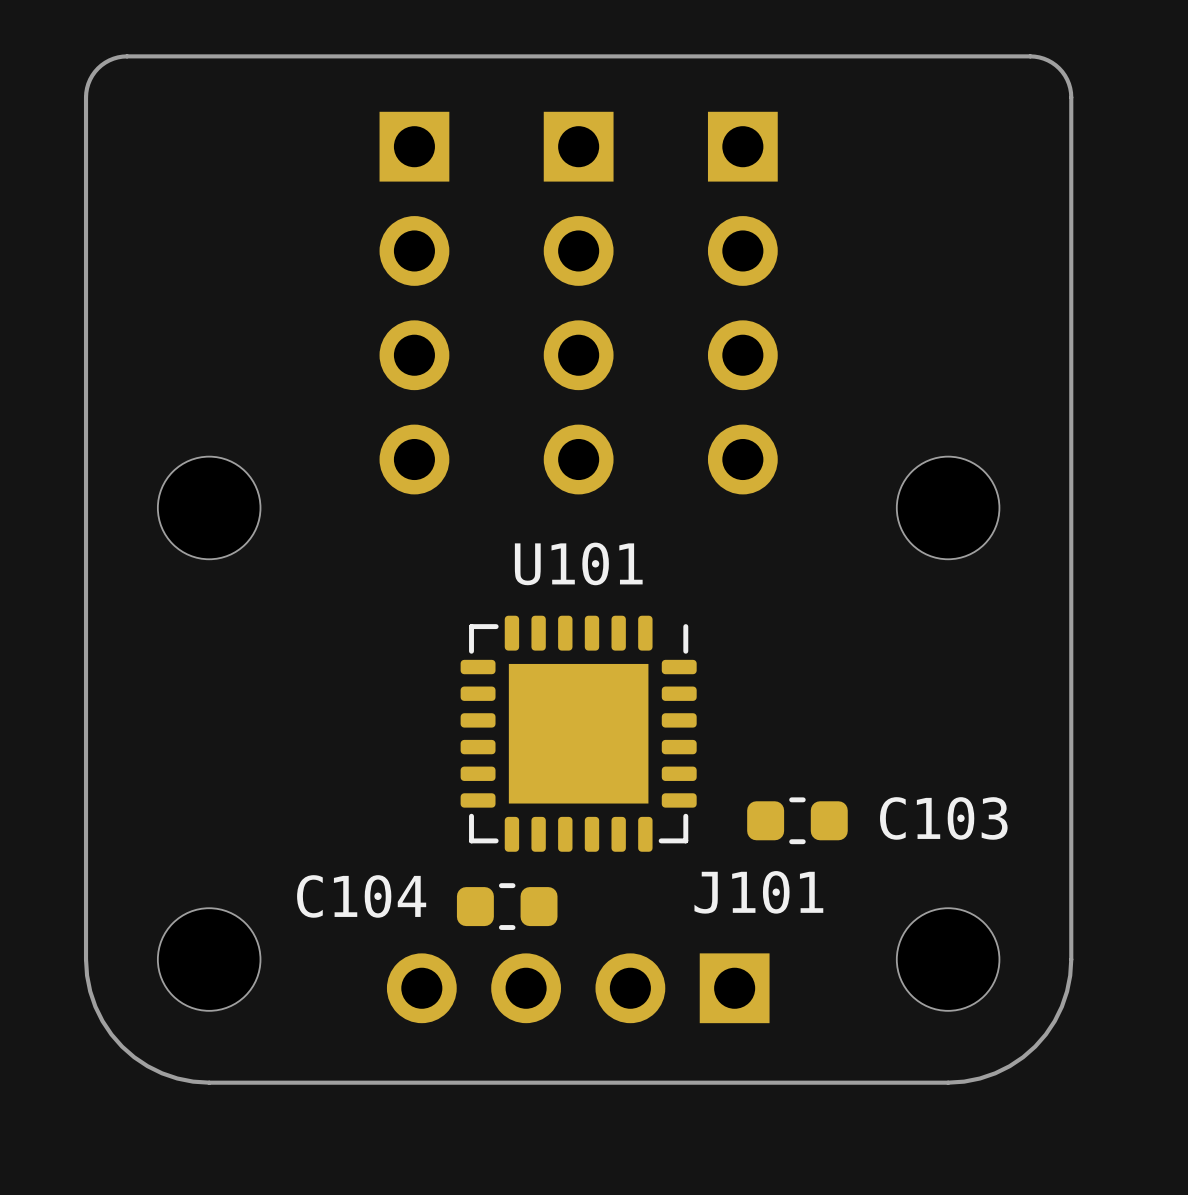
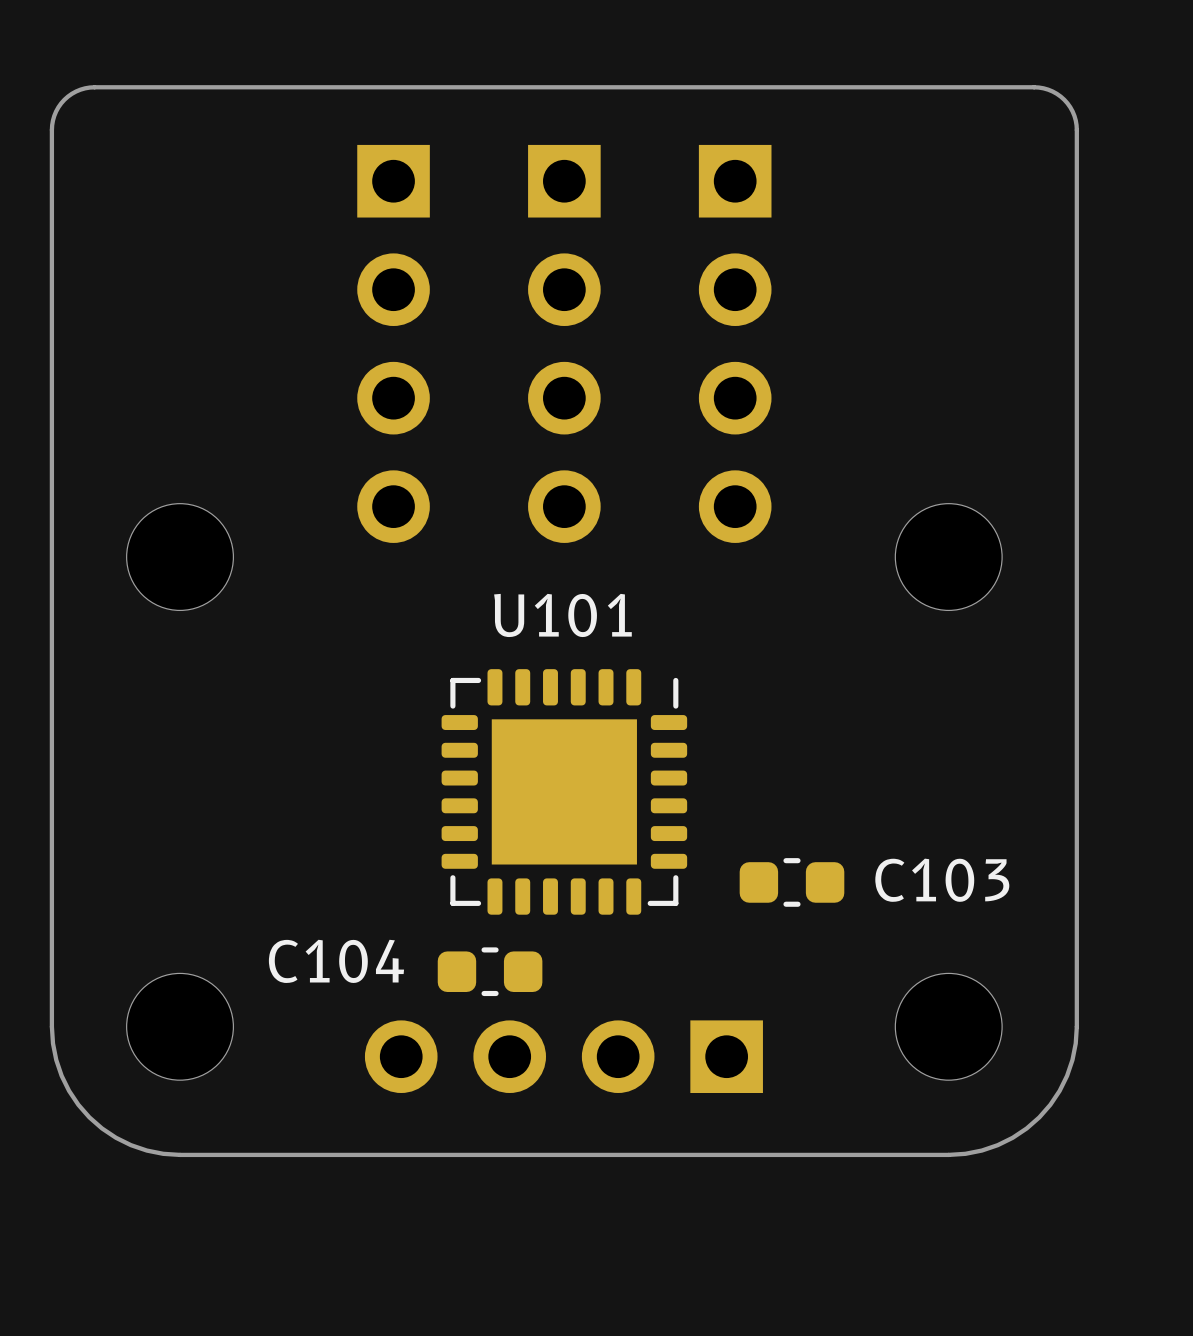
J101 name: J101 (758, 892) -> none

